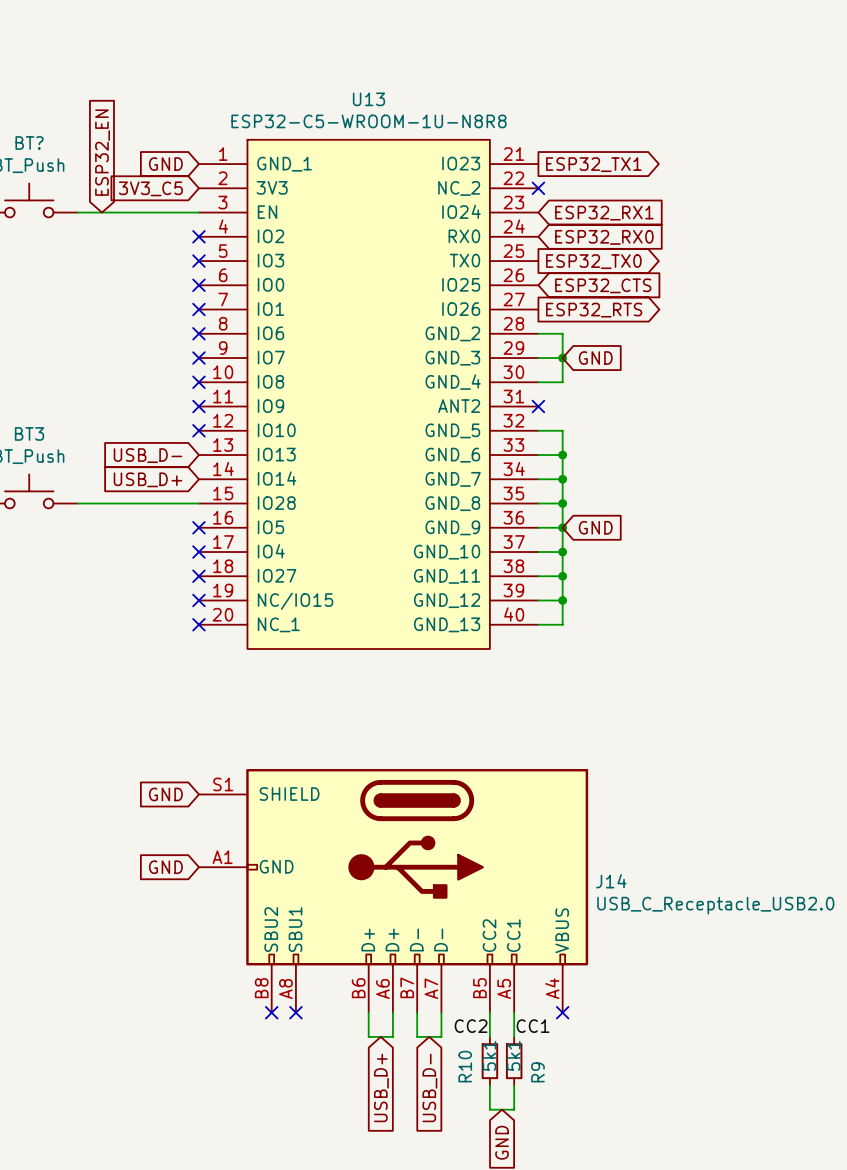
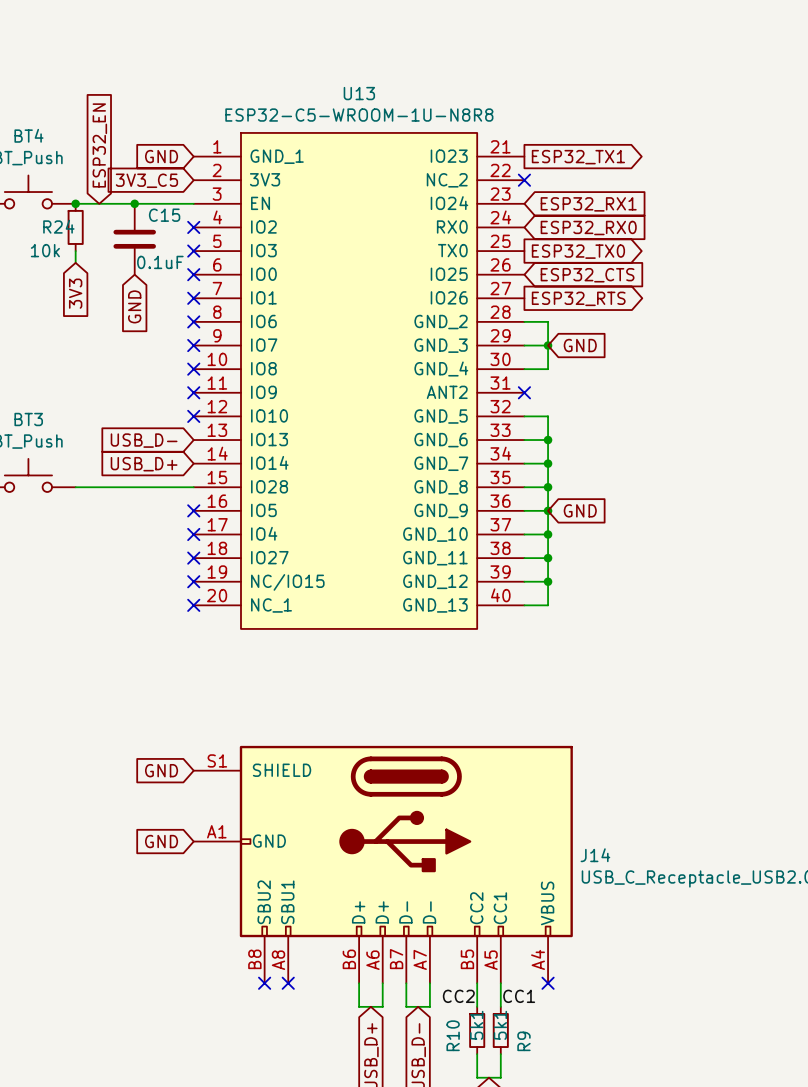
BT? name: BT? (29, 142) -> BT4 (28, 135)
junction: none -> (75, 203)
junction: none -> (134, 203)
R24: none -> 10k (75, 227)
C15: none -> 0.1uF (134, 239)
wire: none -> (75, 251) (75, 262)
global label: none -> 3V3 (75, 293)
global label: none -> GND (134, 306)

